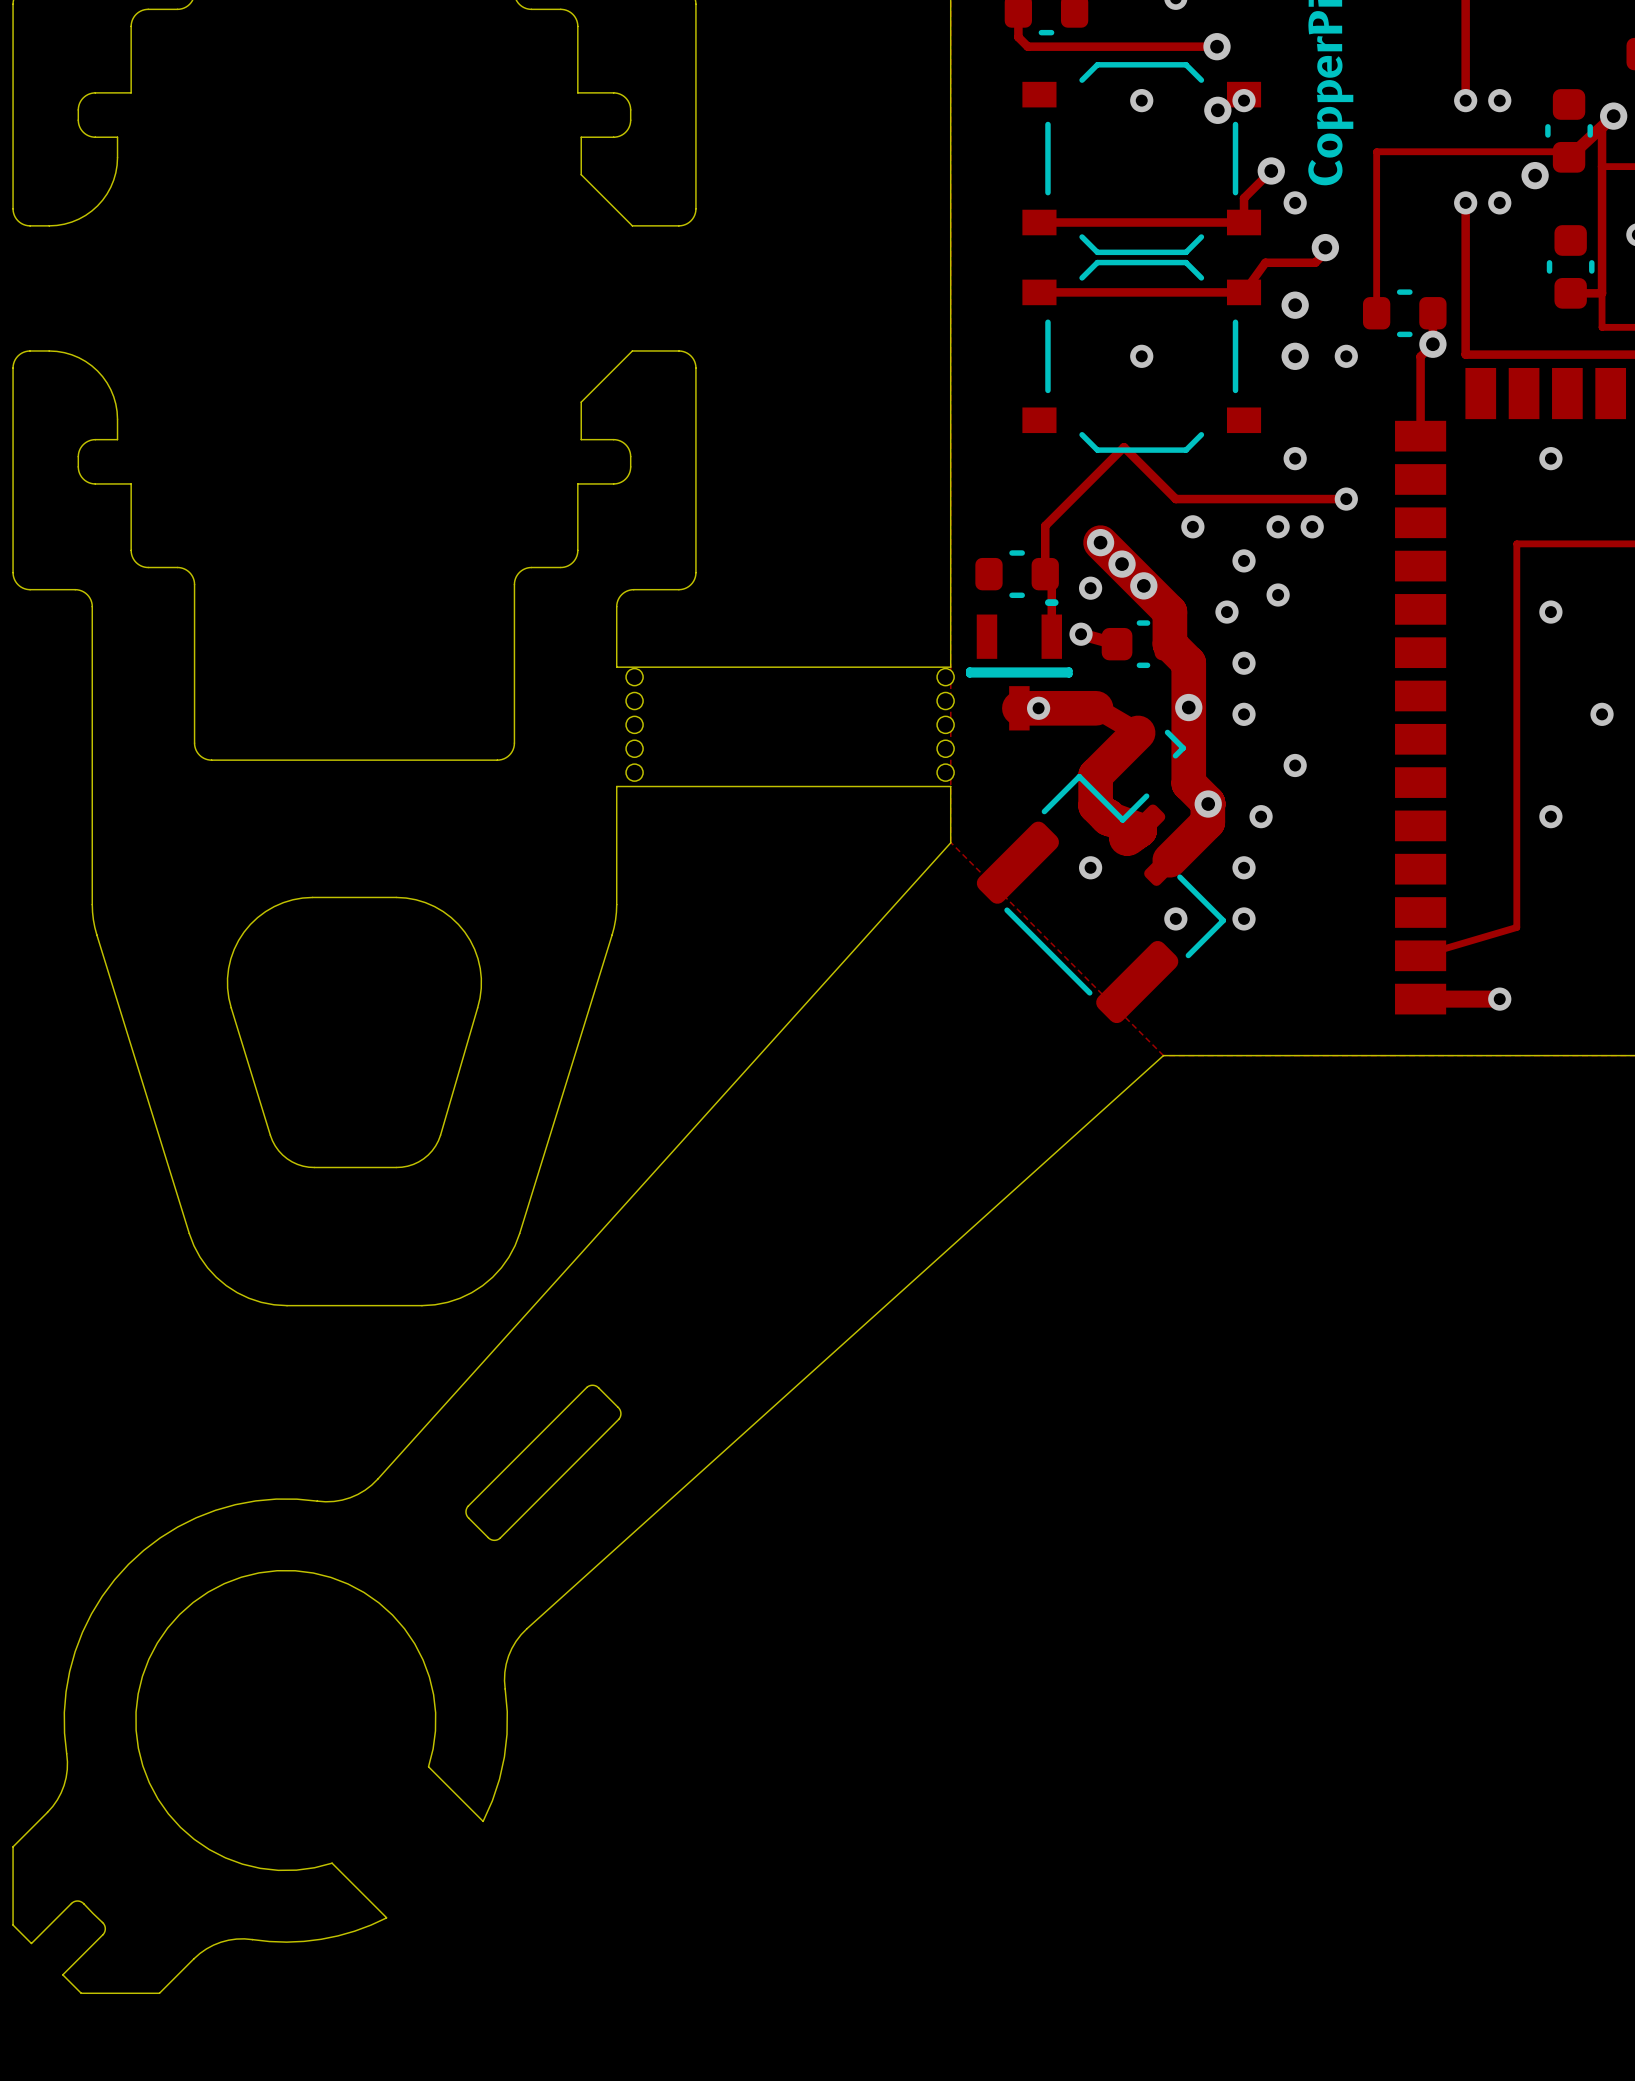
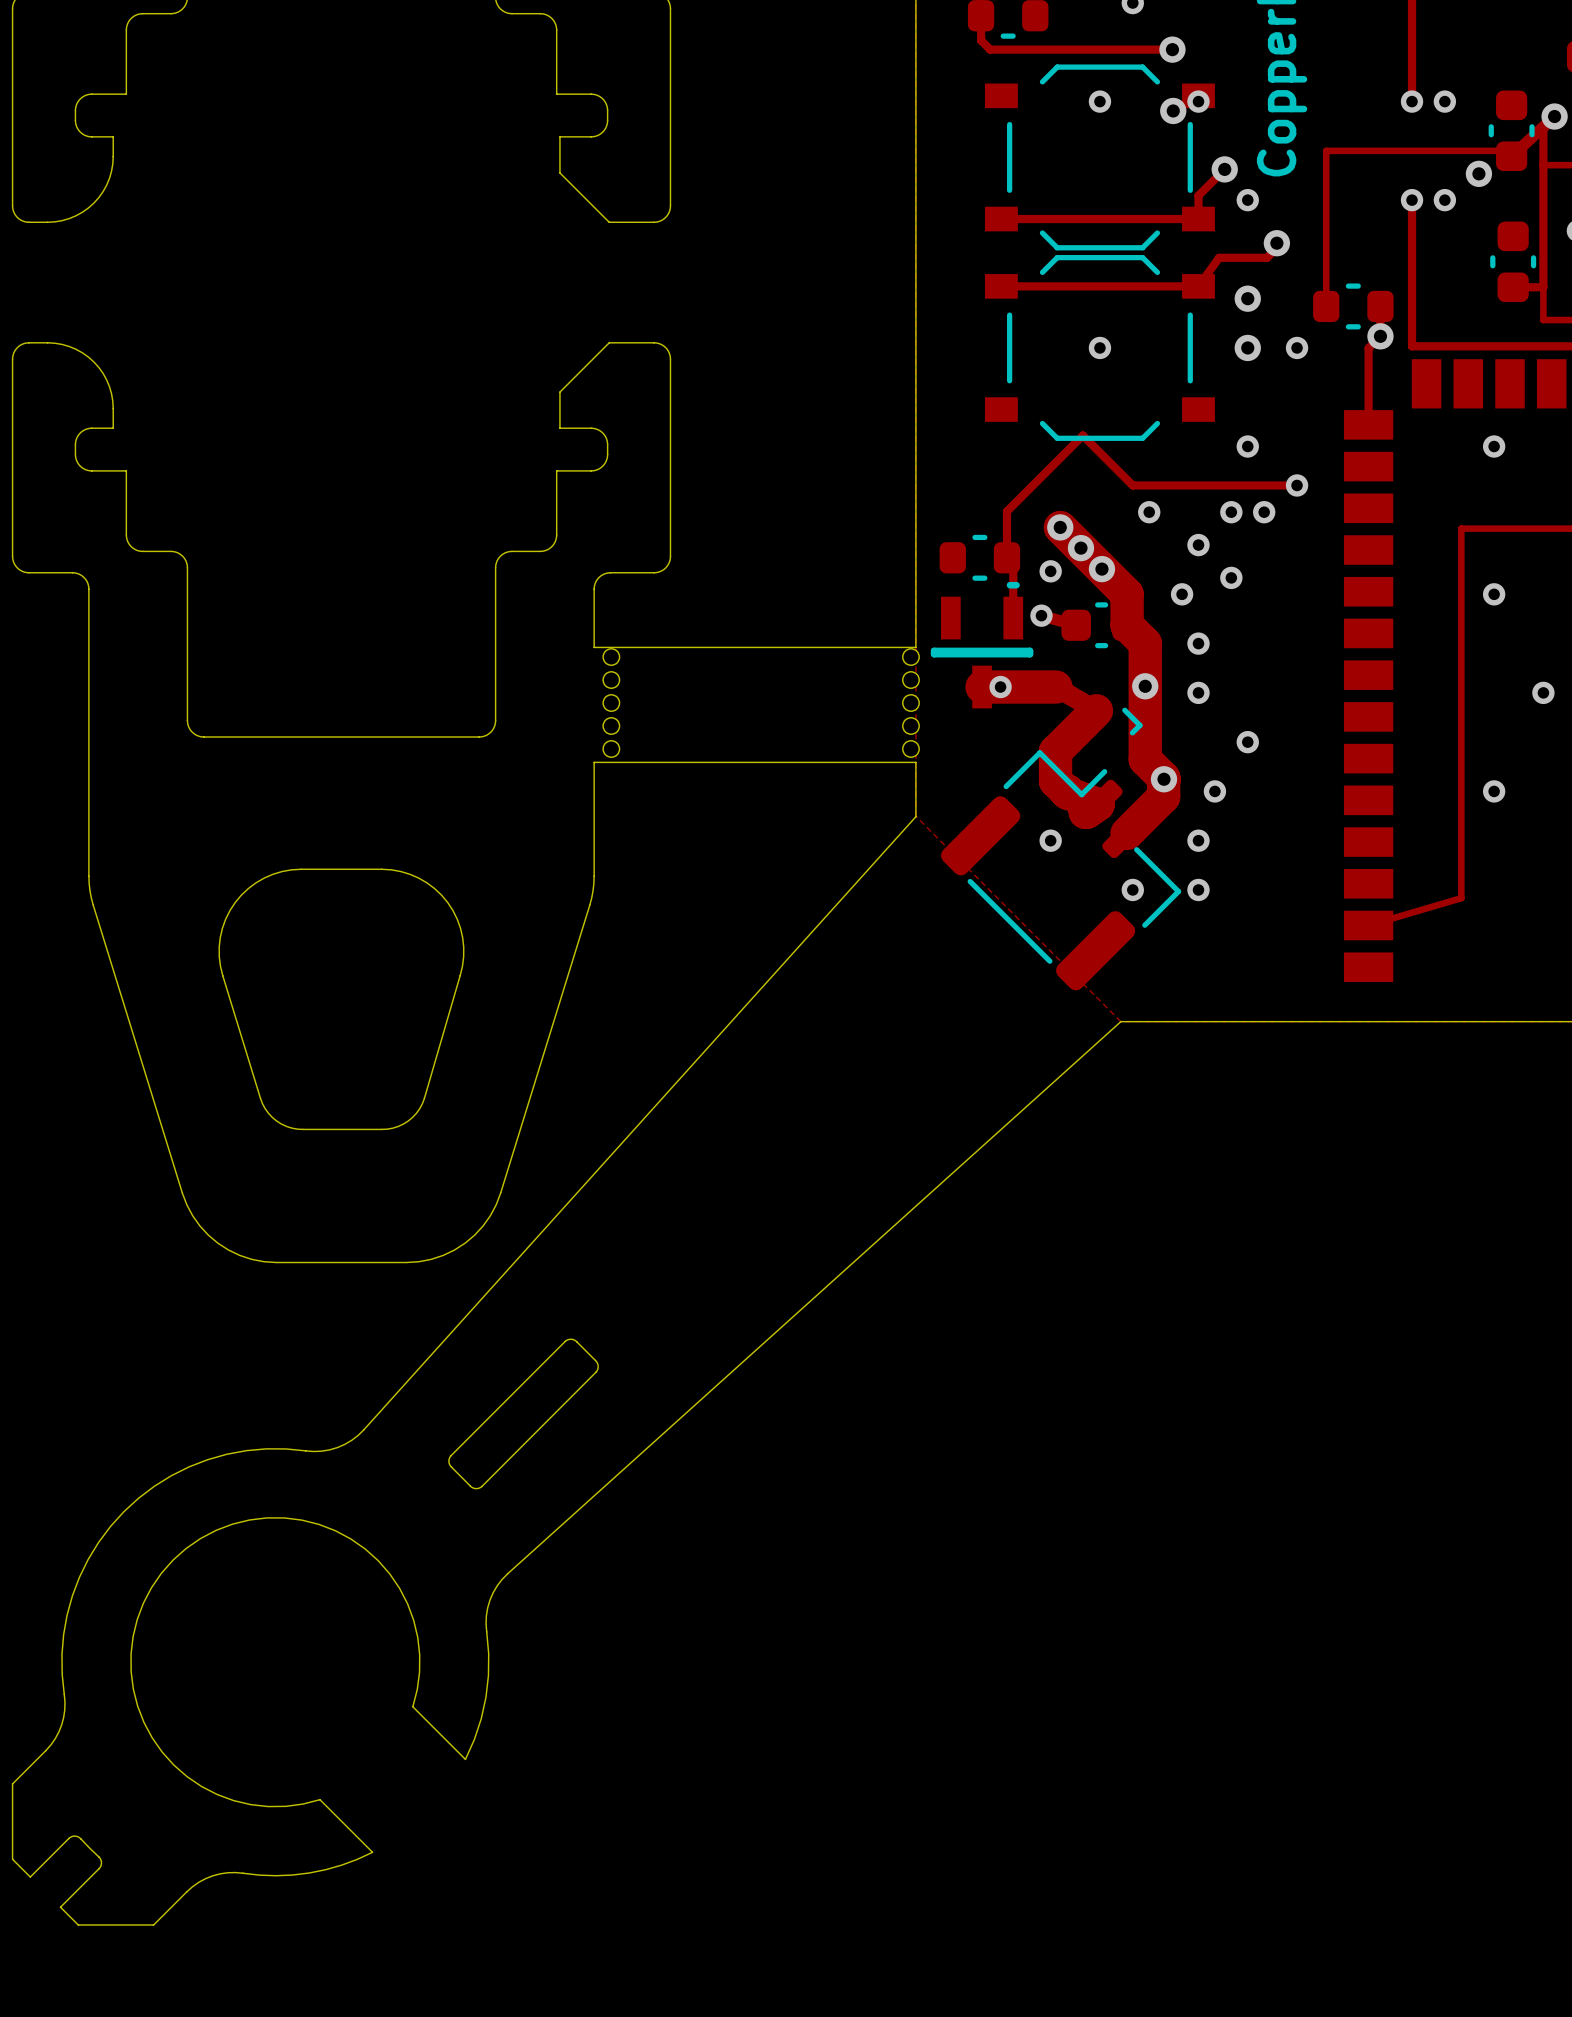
track: (1420, 999) (1499, 999) -> none
via: (1499, 999) -> none

